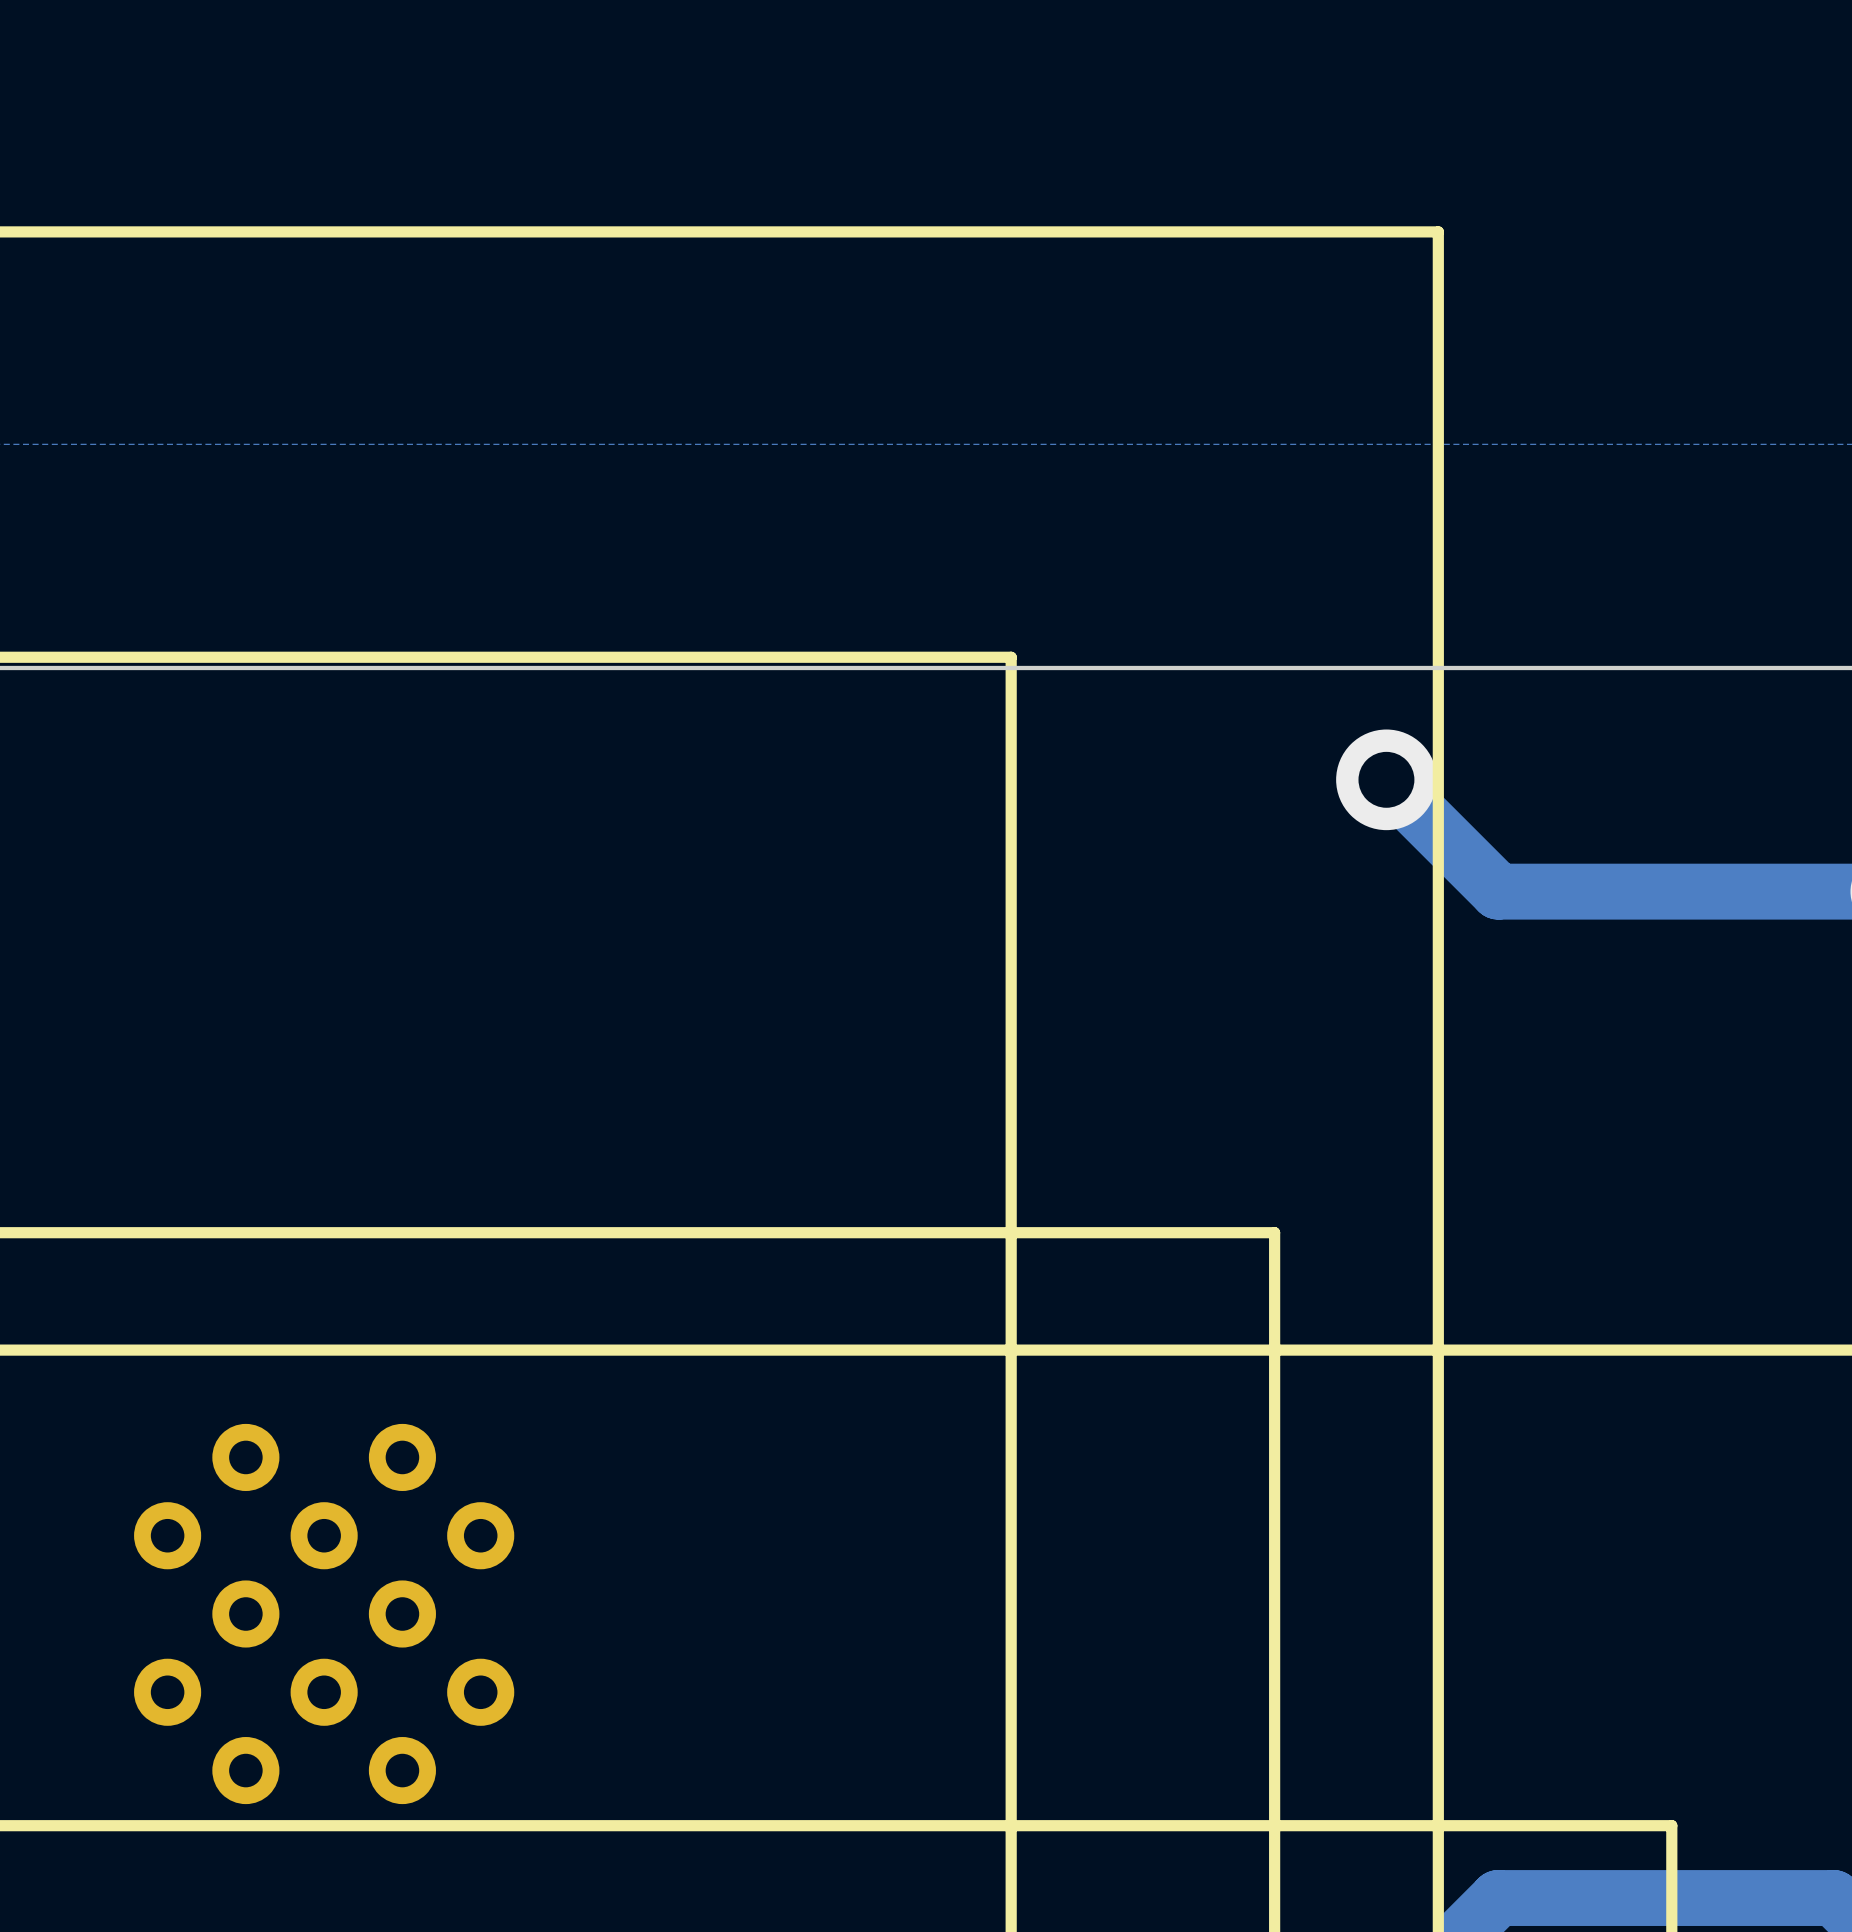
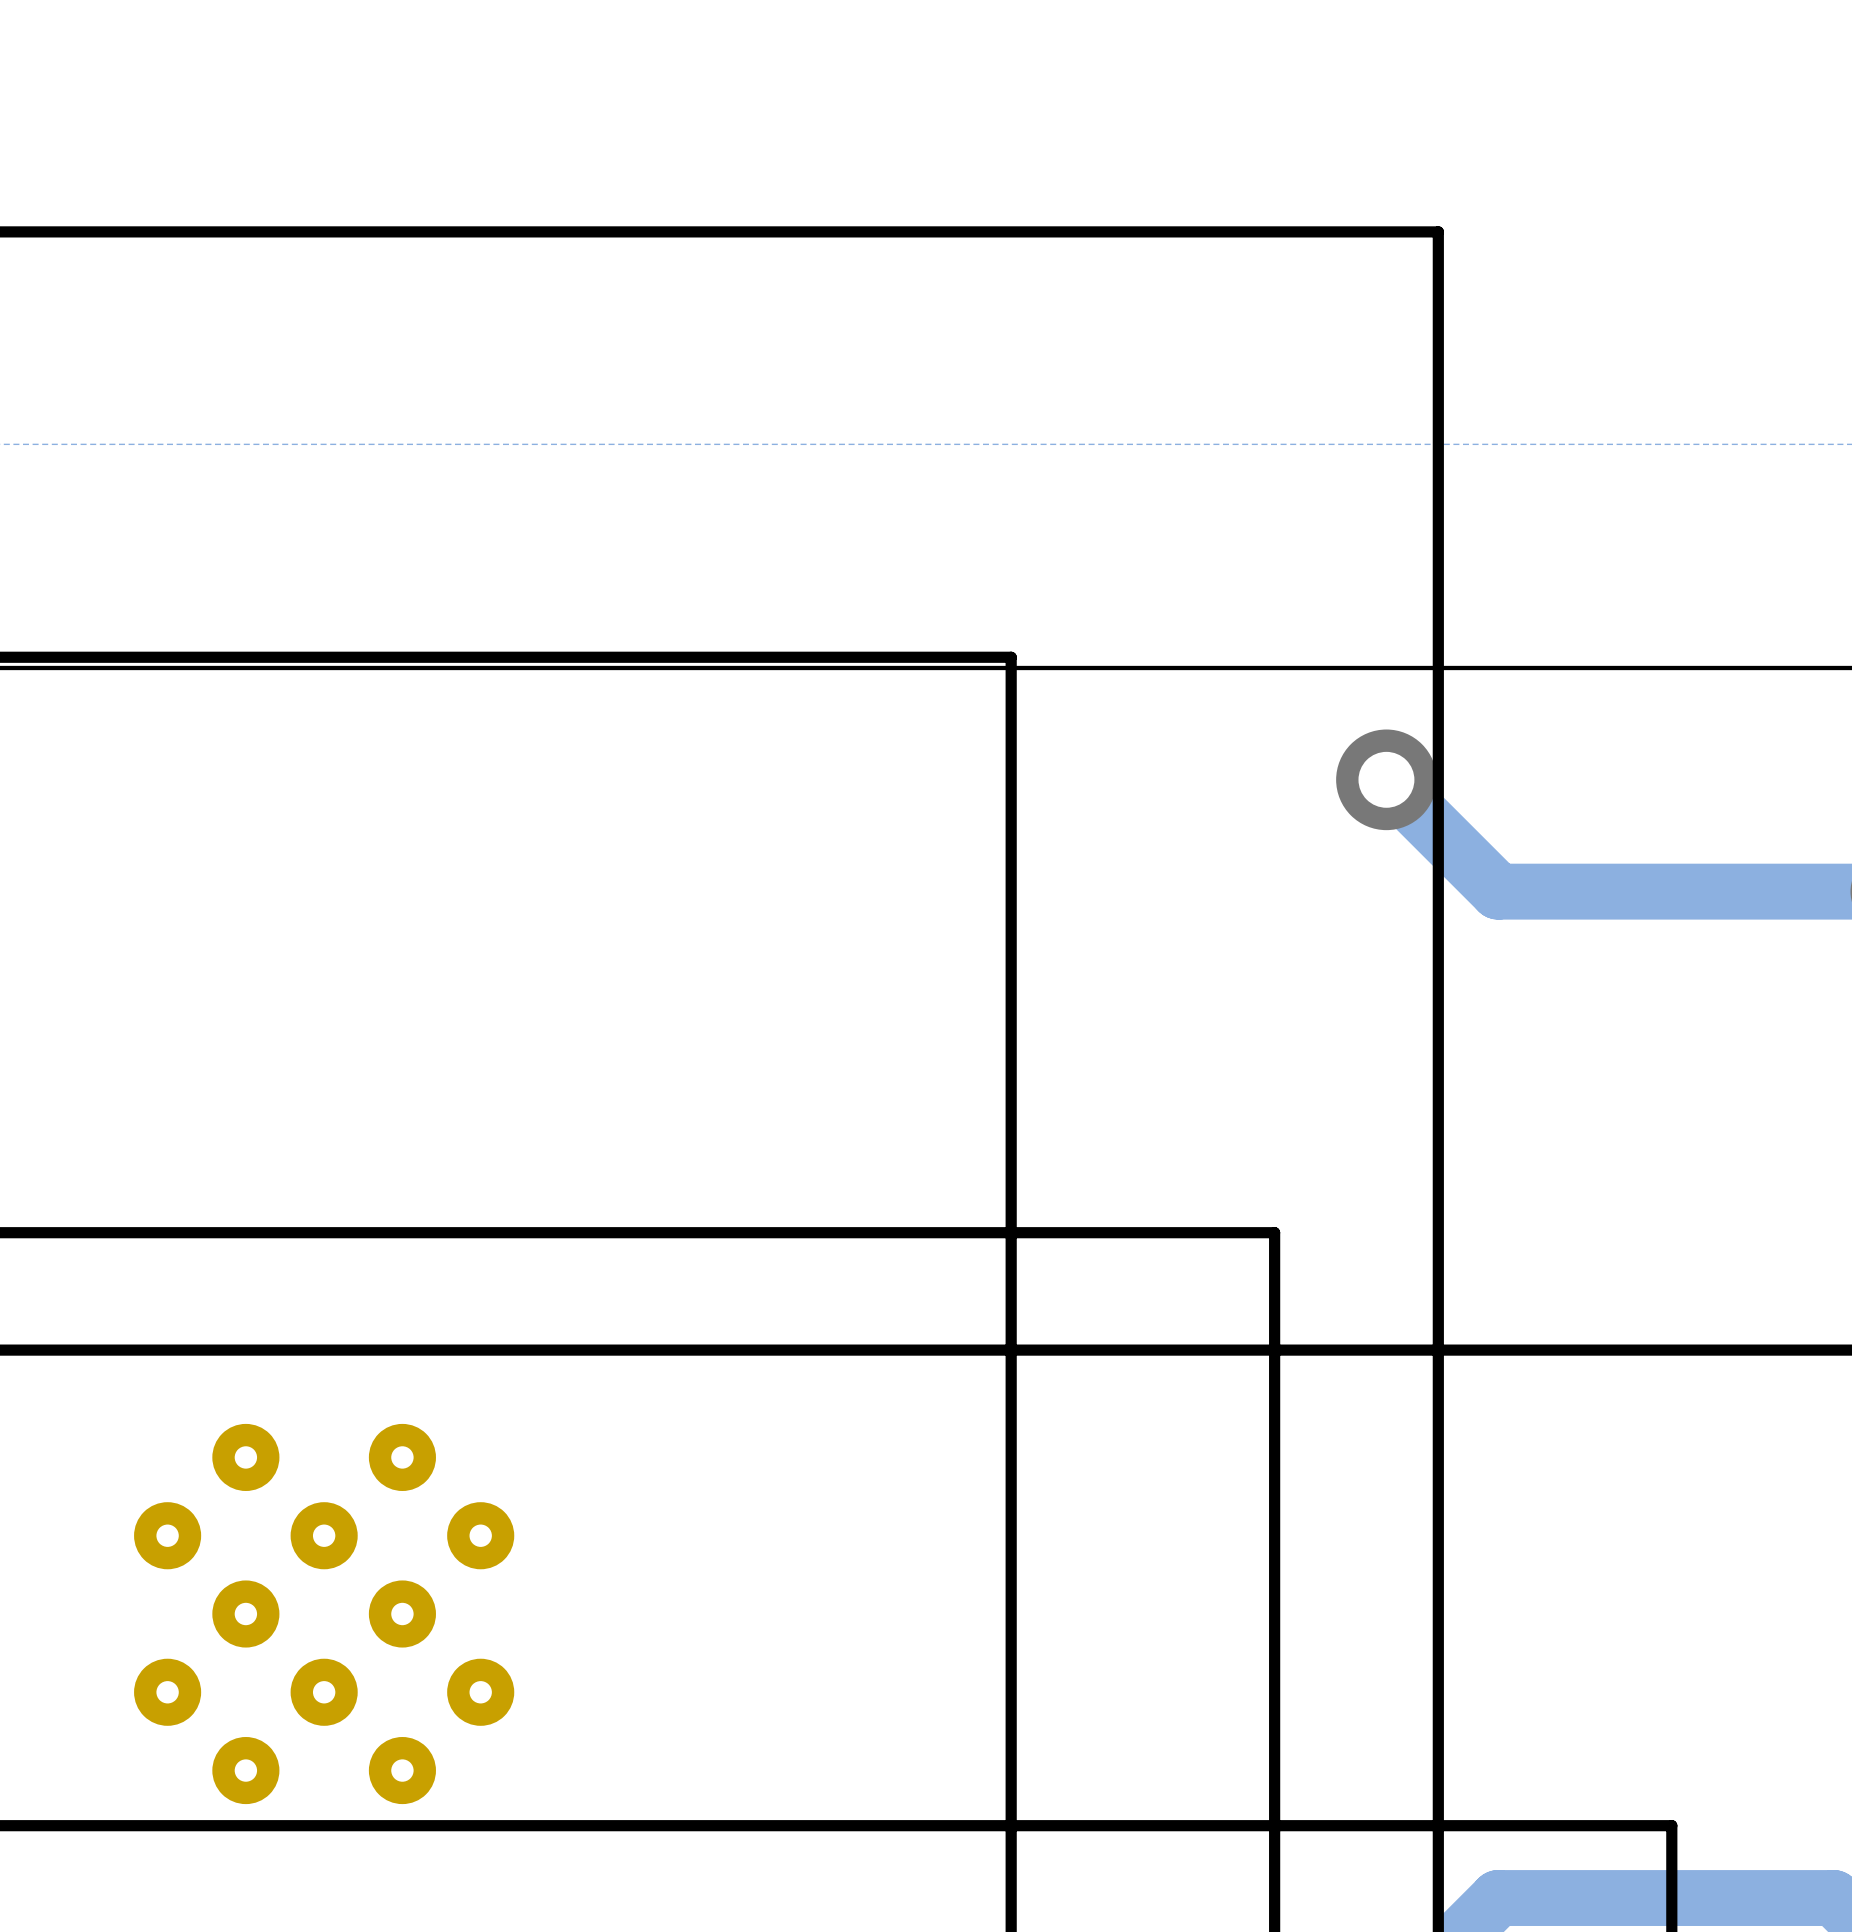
part footprint: [134, 1423, 515, 1805] -> [134, 1423, 515, 1805]

